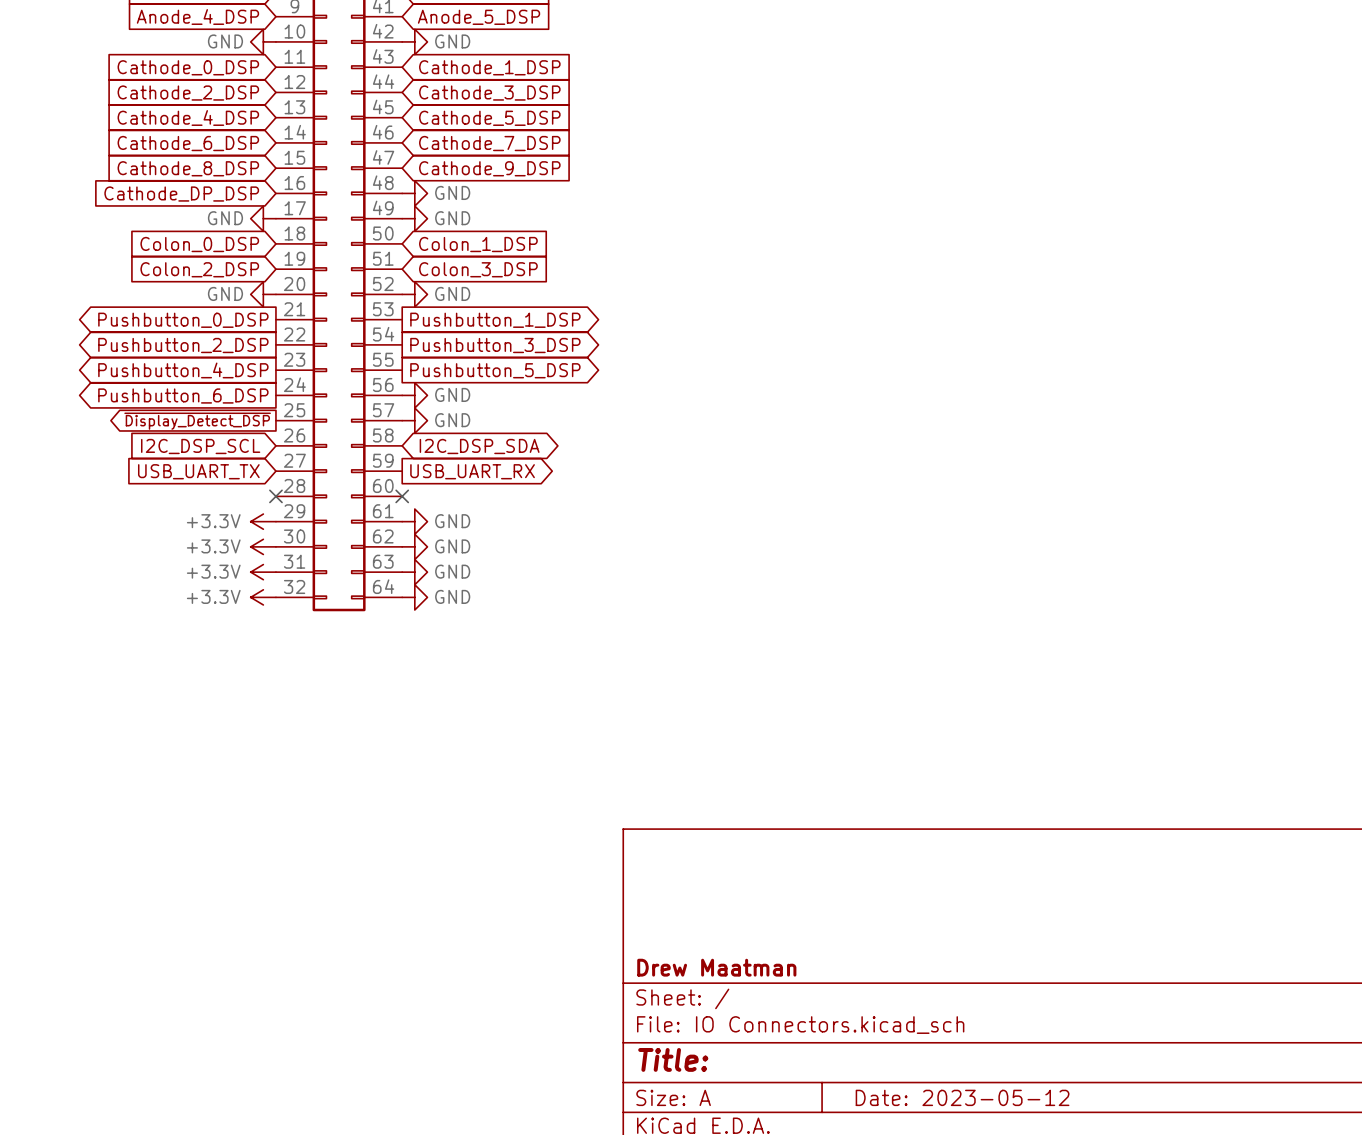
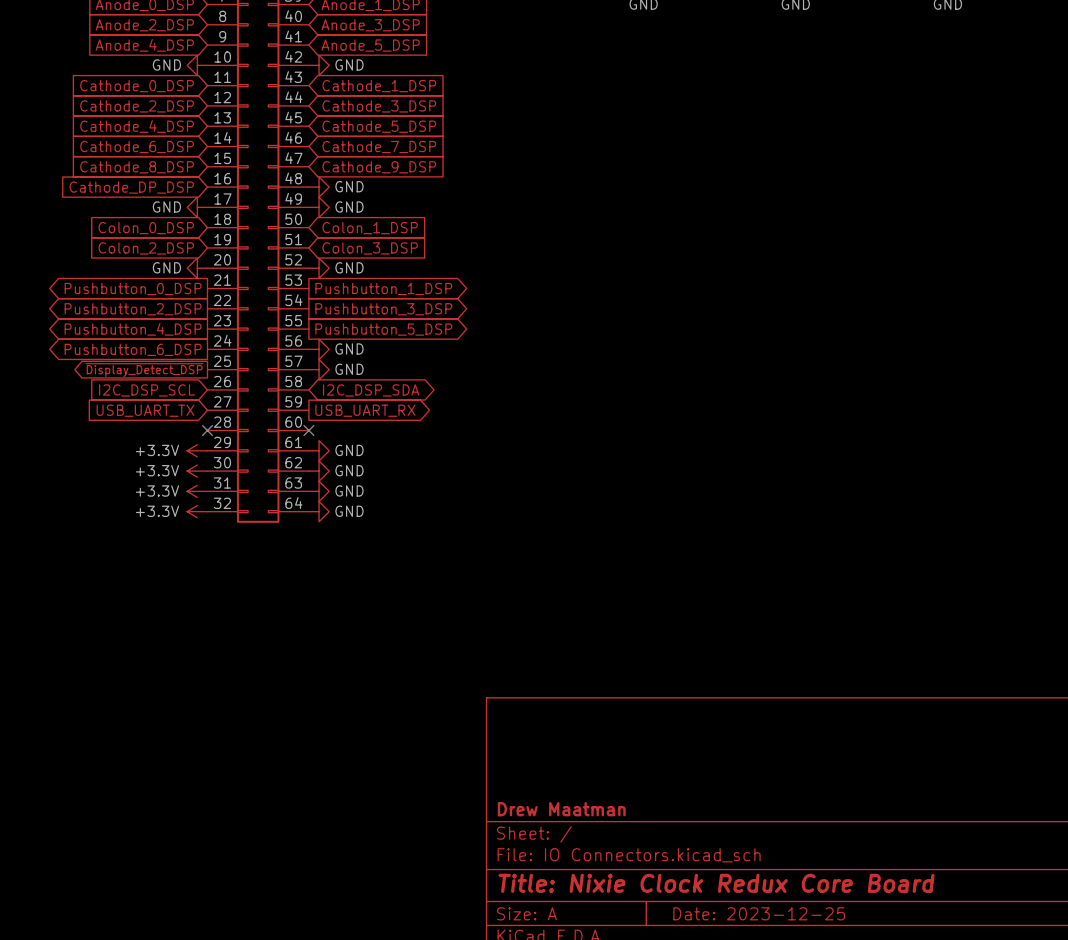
title block: Title: (673, 1059) -> Title: Nixie Clock Redux Core Board (716, 883)
title block: Date: 2023-05-12 (962, 1097) -> Date: 2023-12-25 (759, 913)

